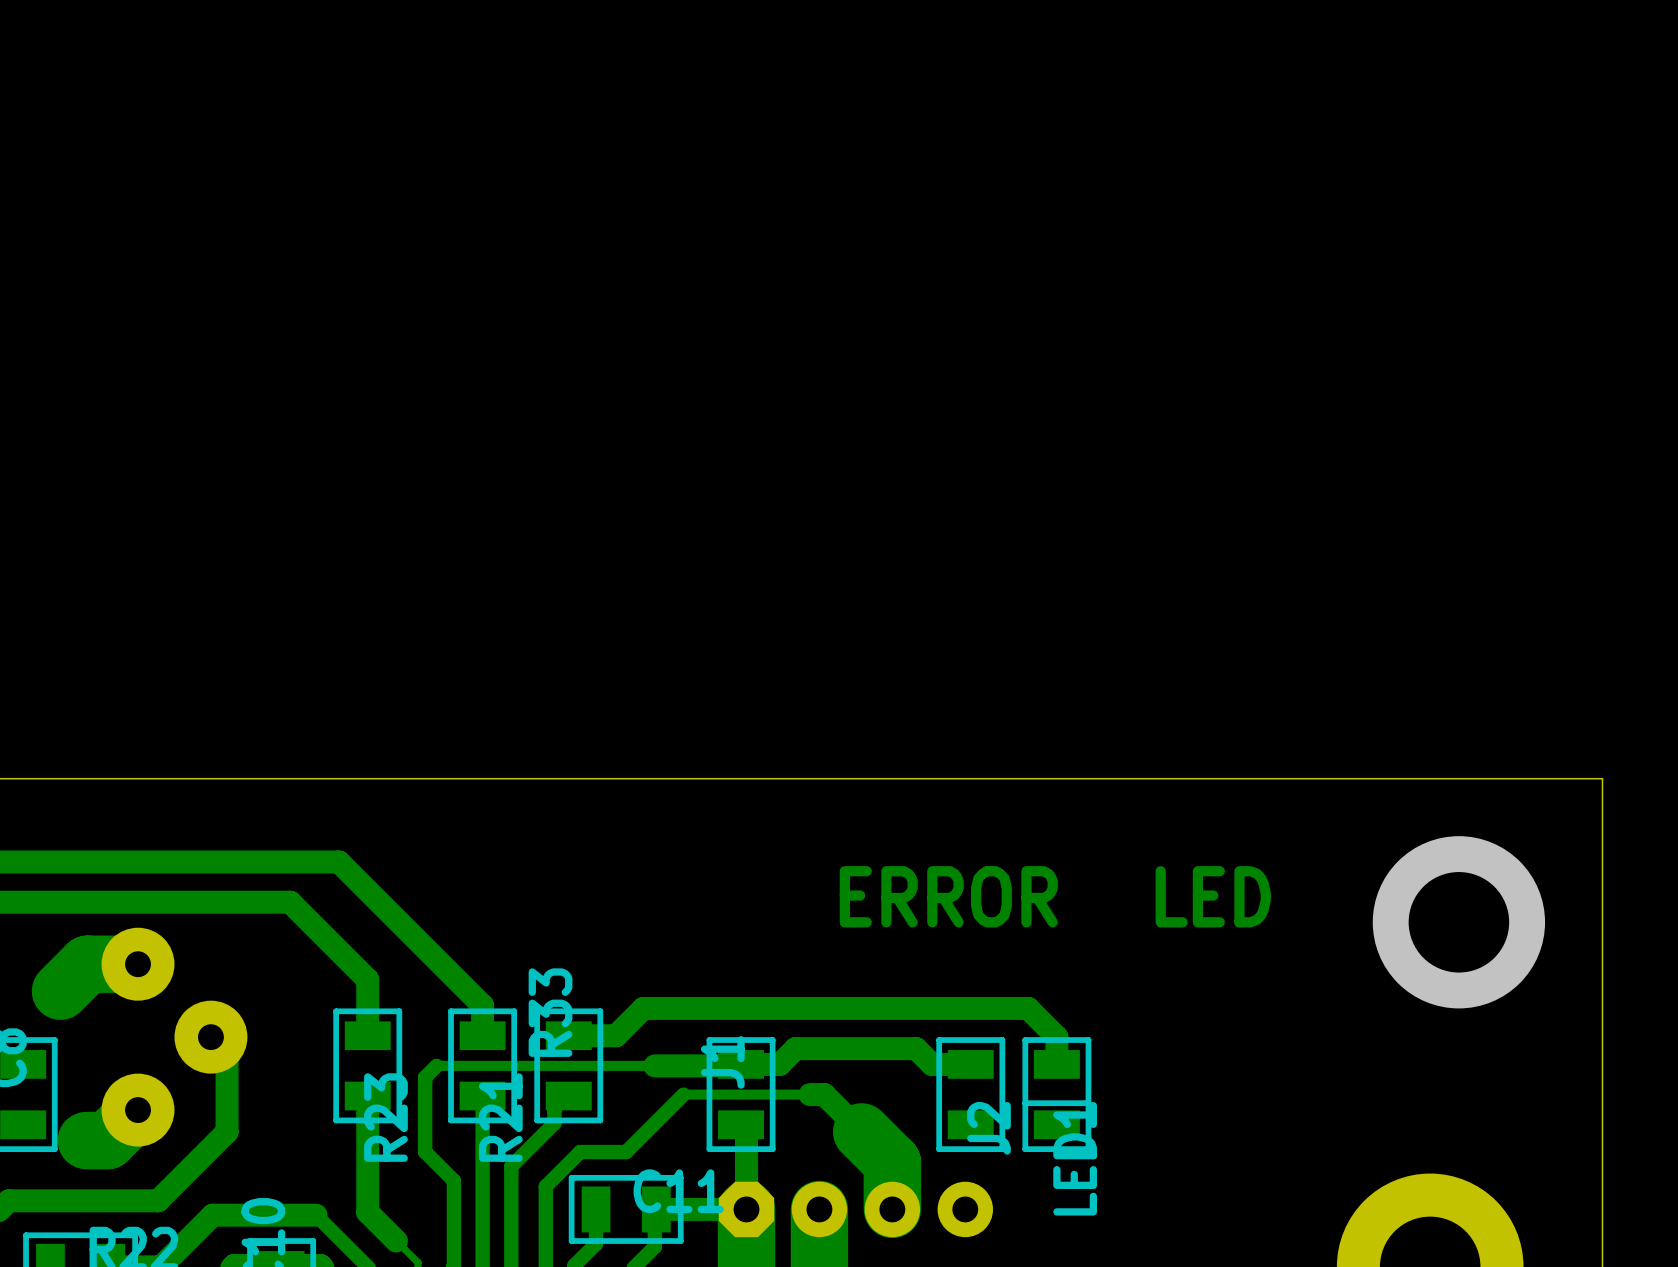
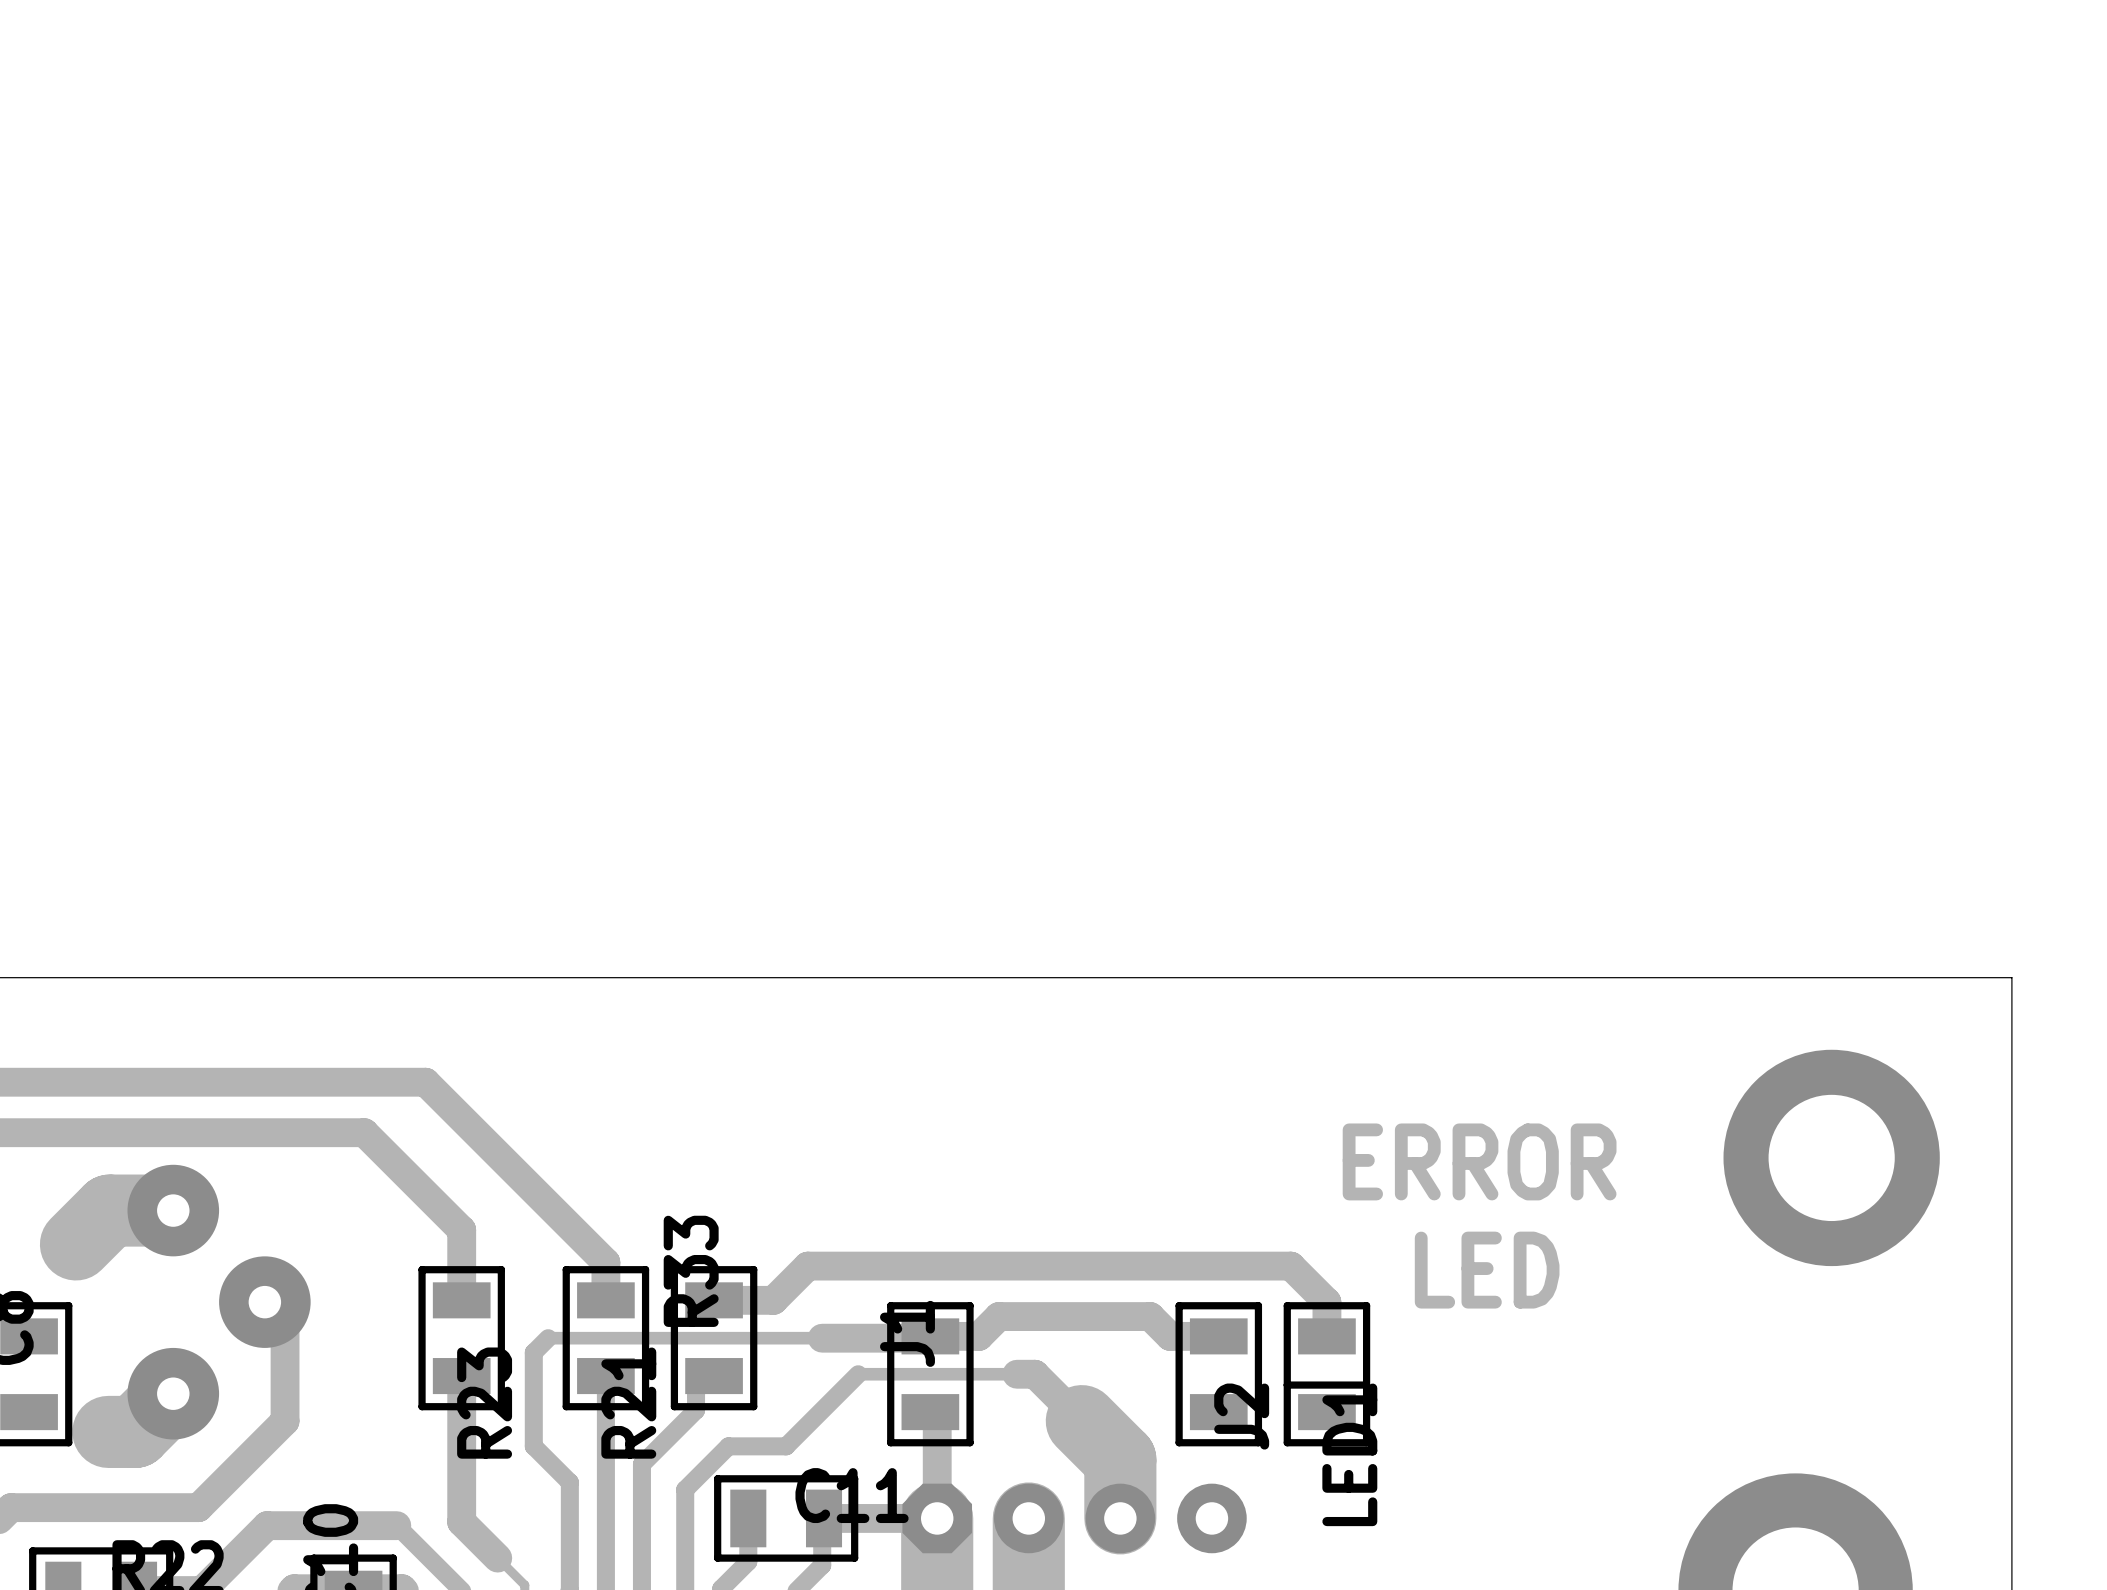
text position: ERROR (948, 896) -> ERROR (1479, 1161)
text position: LED (1213, 896) -> LED (1487, 1270)

